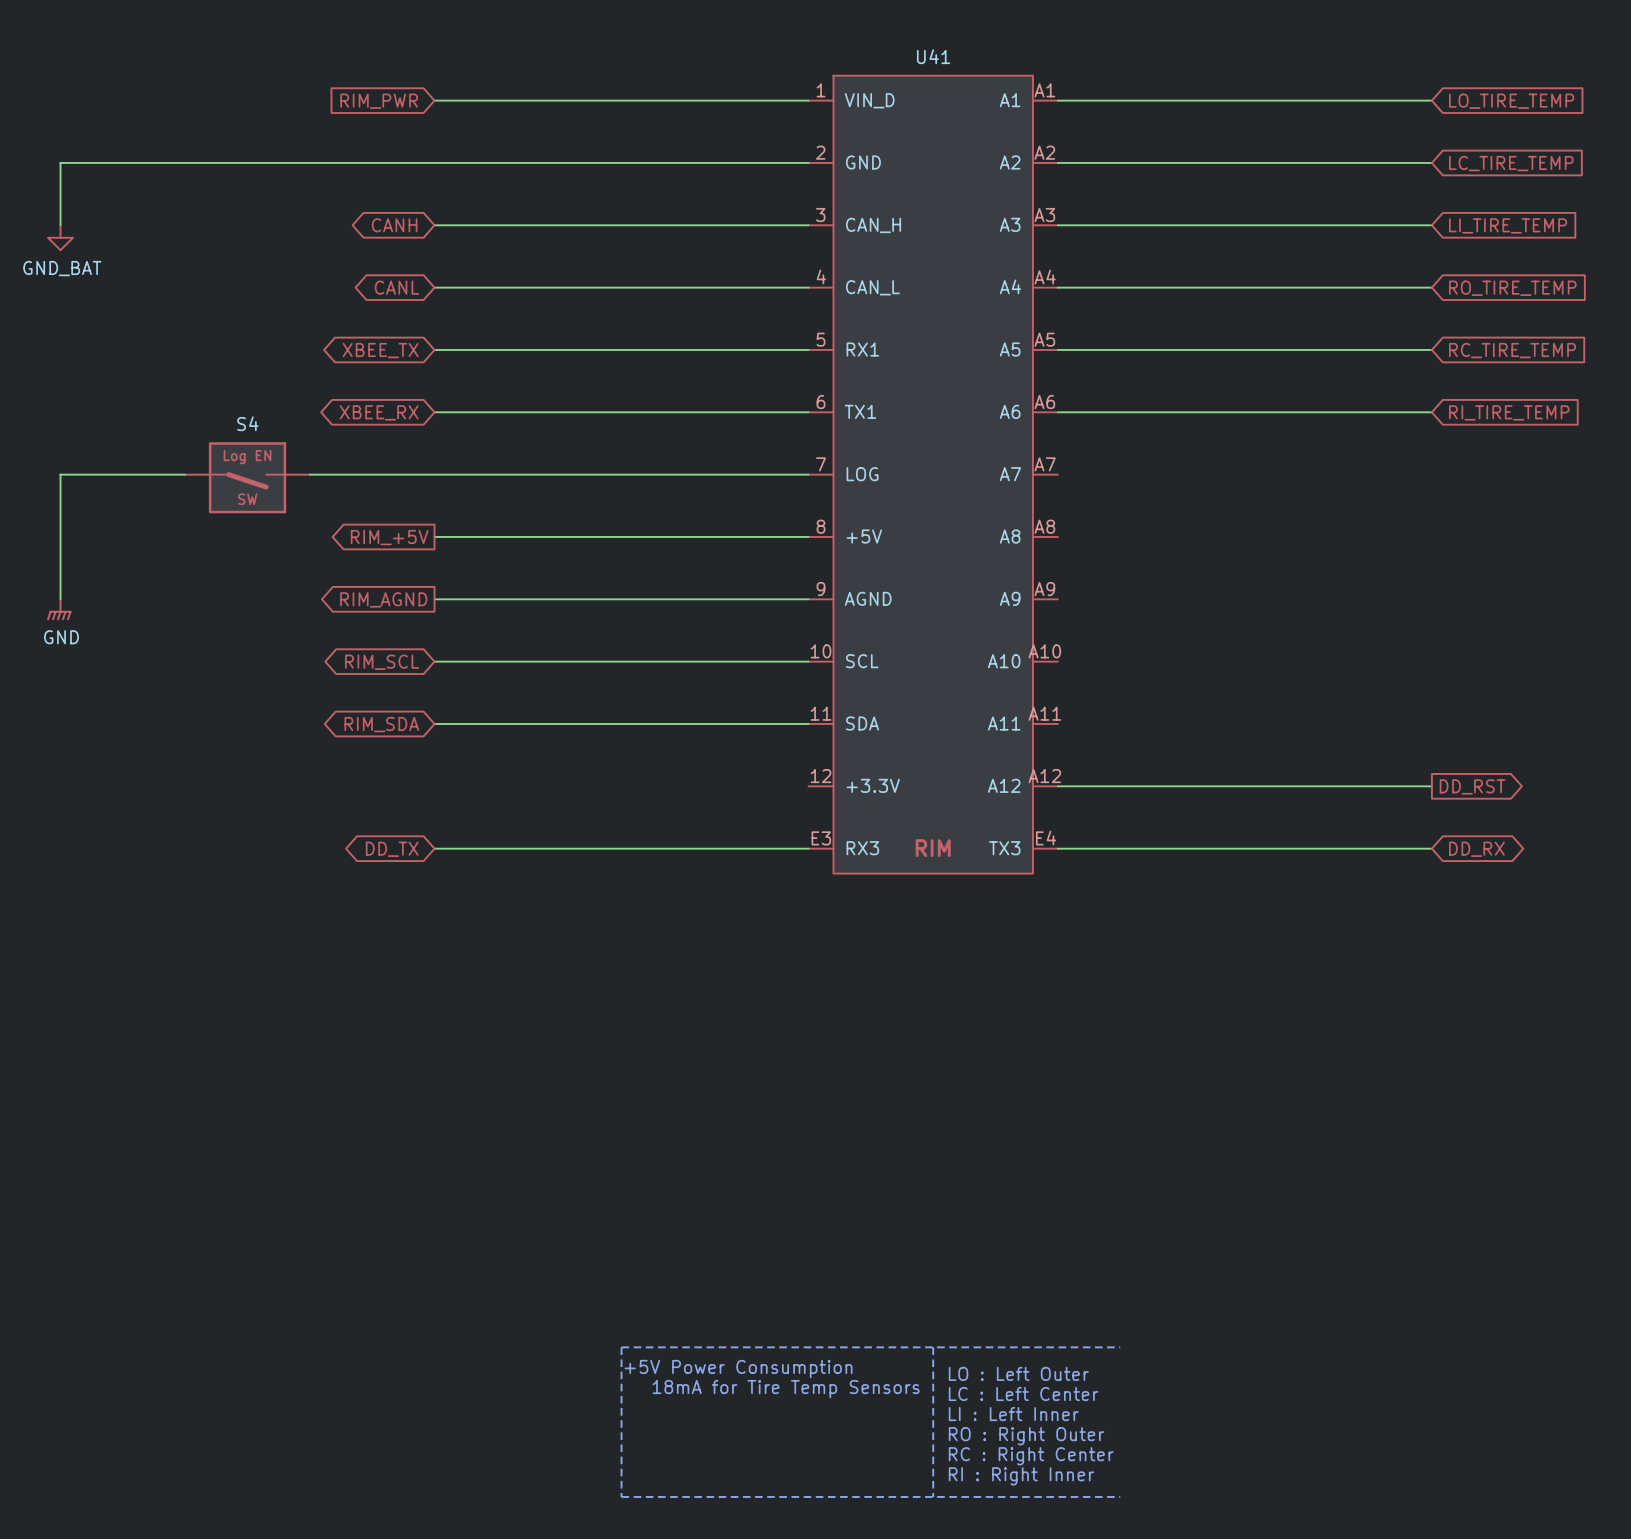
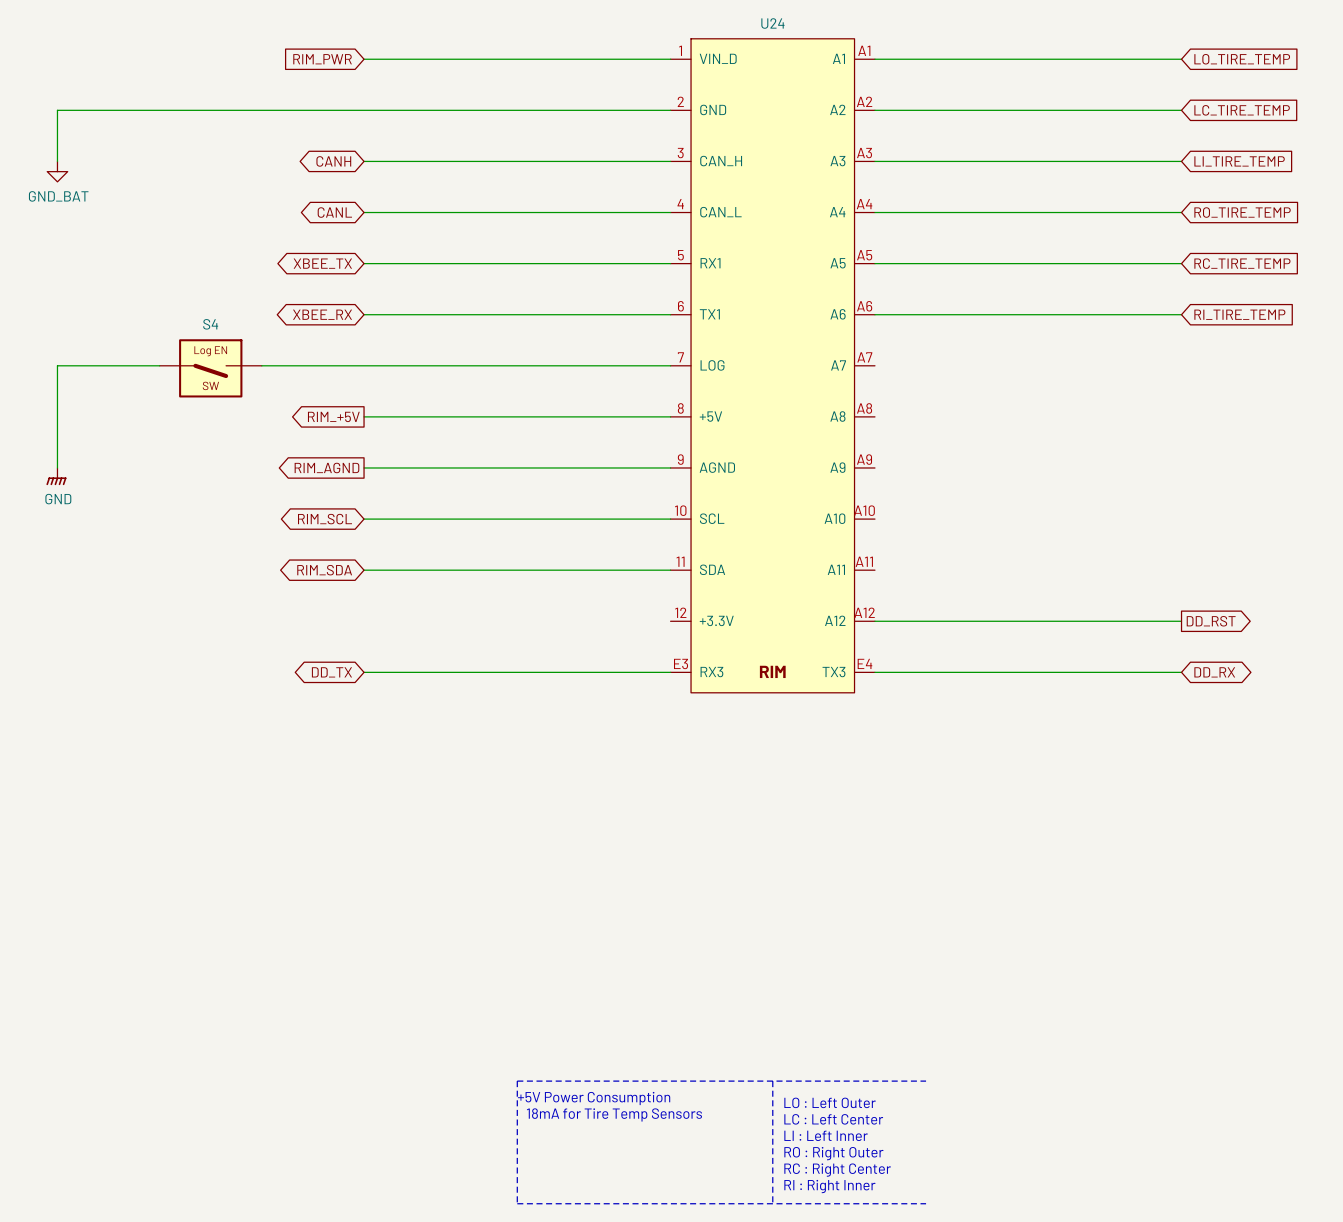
U41 name: U41 (933, 56) -> U24 (772, 23)

